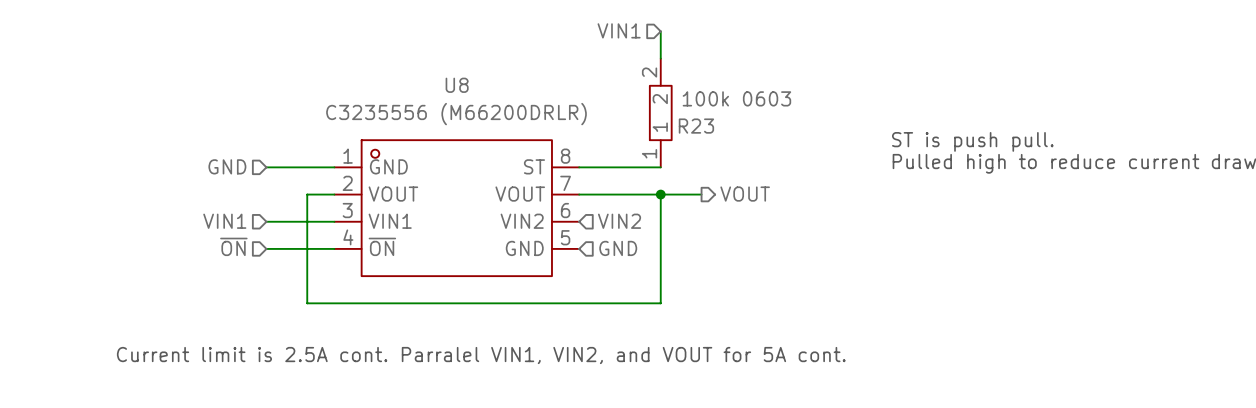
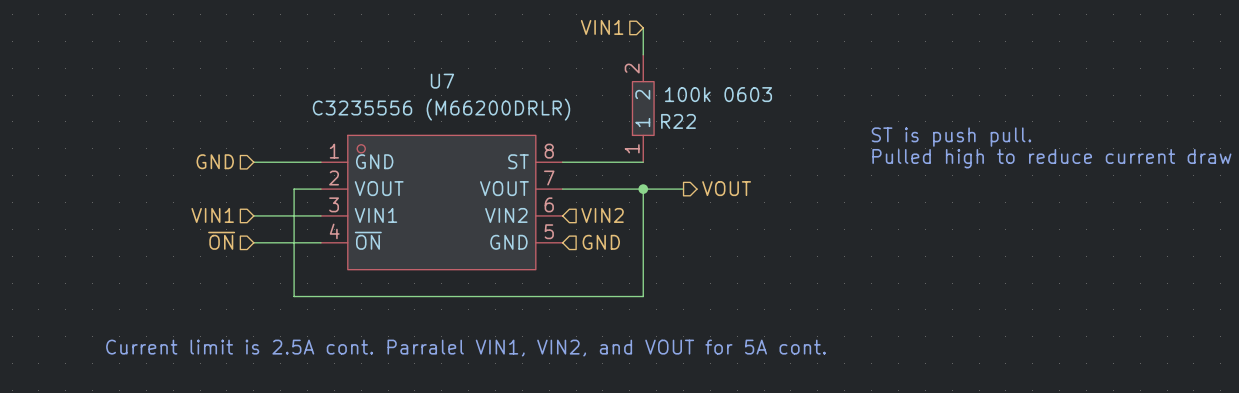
U8 name: U8 (457, 85) -> U7 (442, 81)
R23 name: R23 (696, 126) -> R22 (678, 121)

